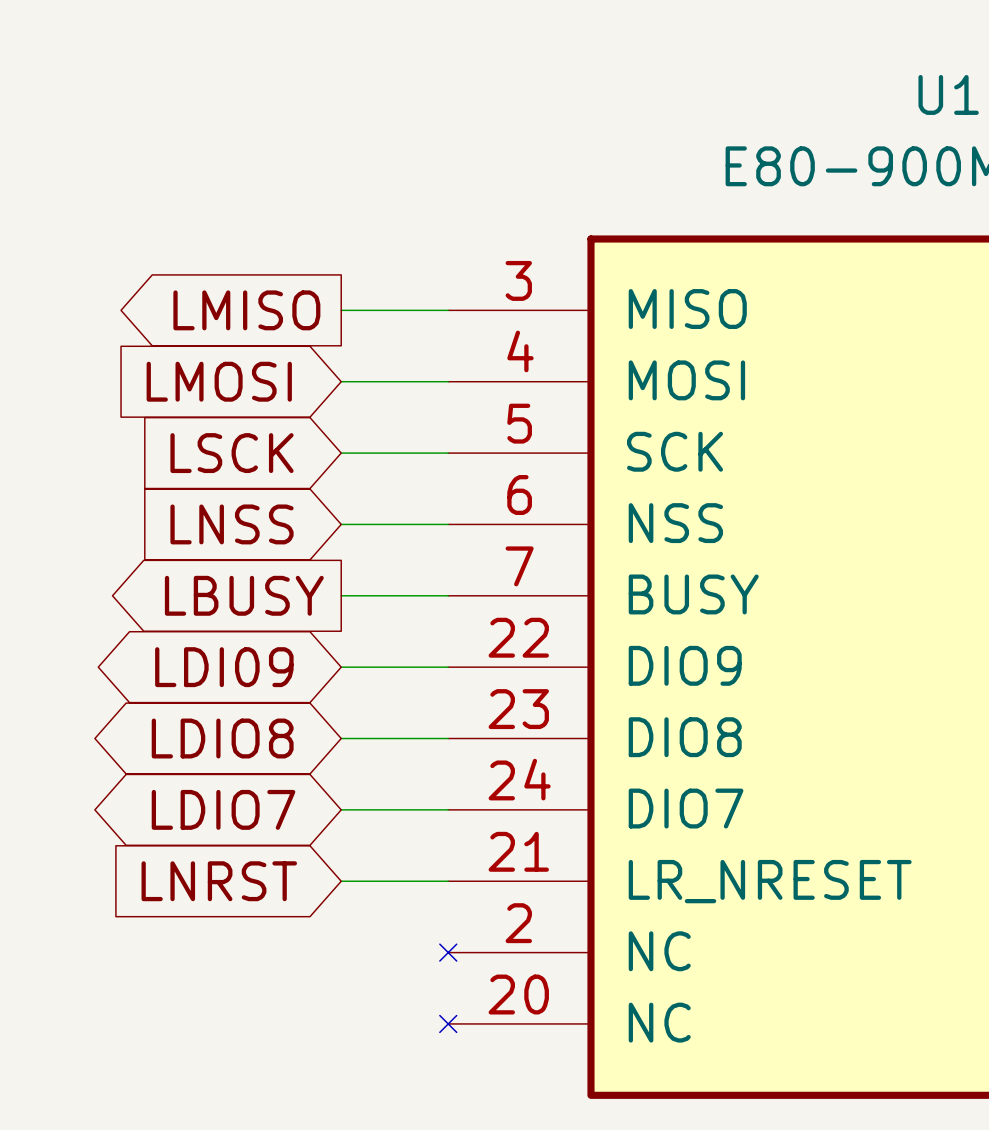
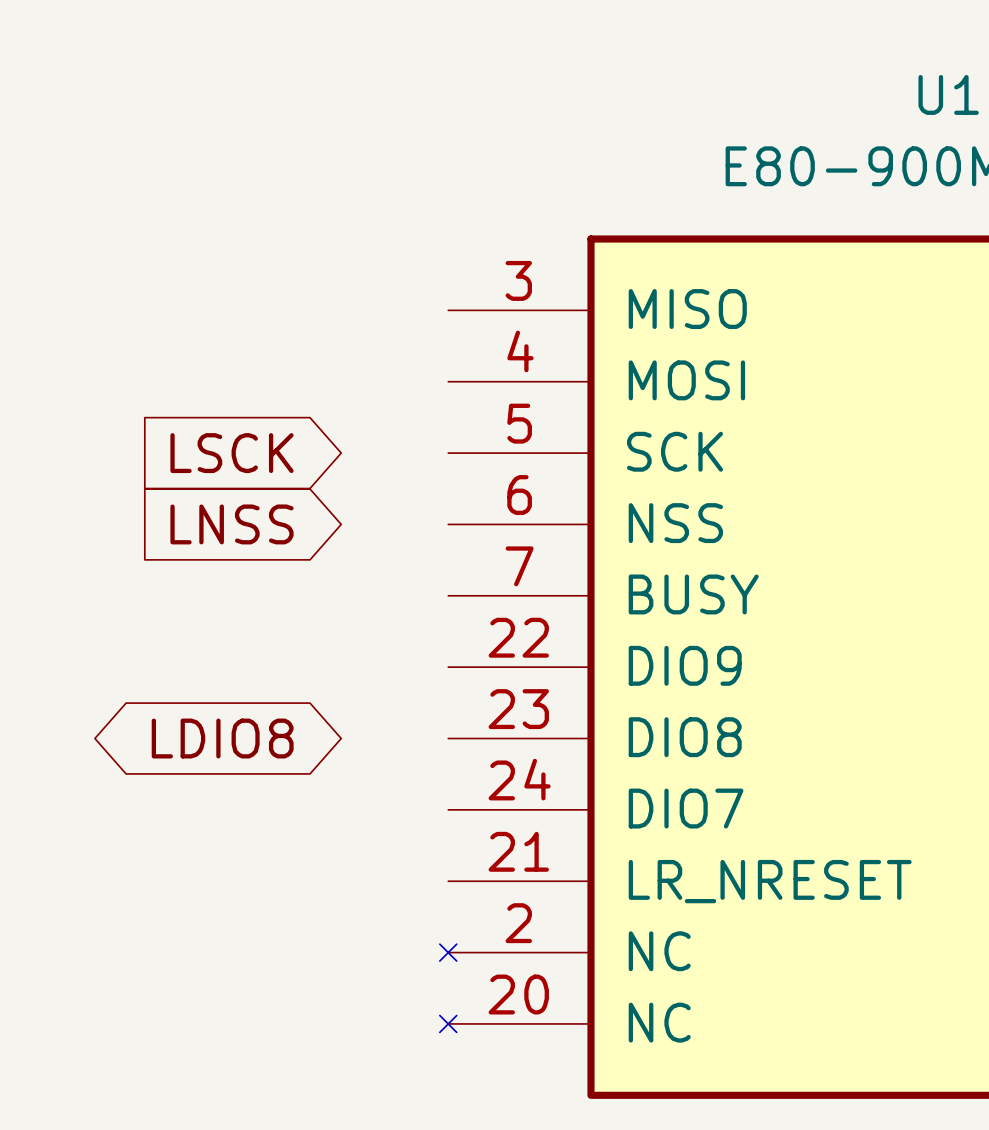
global label: LMISO (246, 310) -> none
wire: (341, 310) (448, 310) -> none
global label: LMOSI (219, 381) -> none
wire: (341, 381) (448, 381) -> none
wire: (341, 453) (448, 453) -> none
wire: (341, 524) (448, 524) -> none
global label: LBUSY (244, 595) -> none
wire: (341, 595) (448, 595) -> none
global label: LDI09 (224, 667) -> none
wire: (341, 667) (448, 667) -> none
wire: (341, 738) (448, 738) -> none
global label: LDIO7 (223, 809) -> none
wire: (341, 809) (448, 809) -> none
global label: LNRST (219, 881) -> none
wire: (341, 881) (448, 881) -> none

